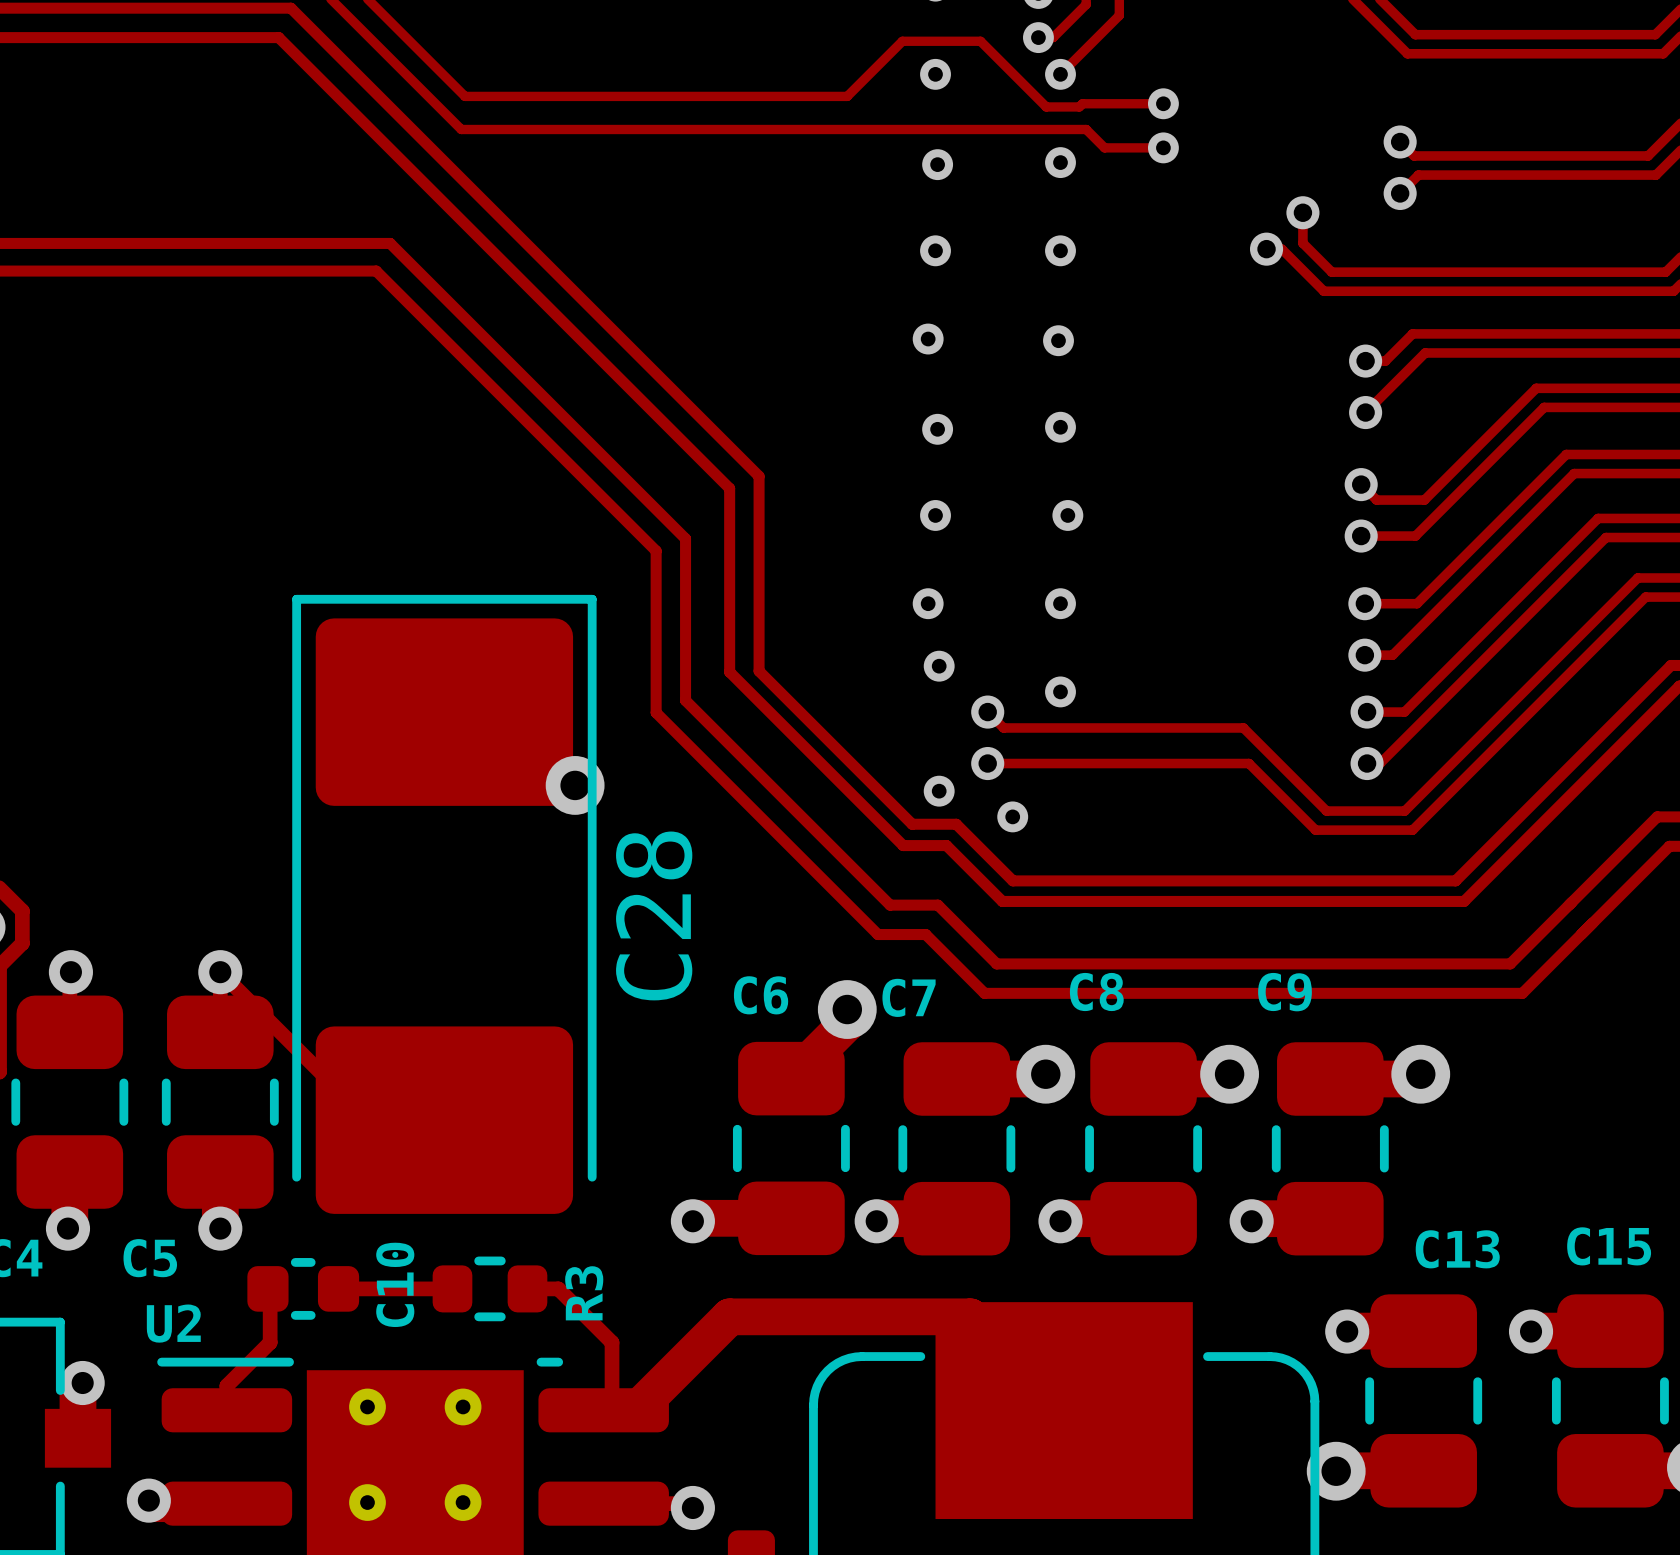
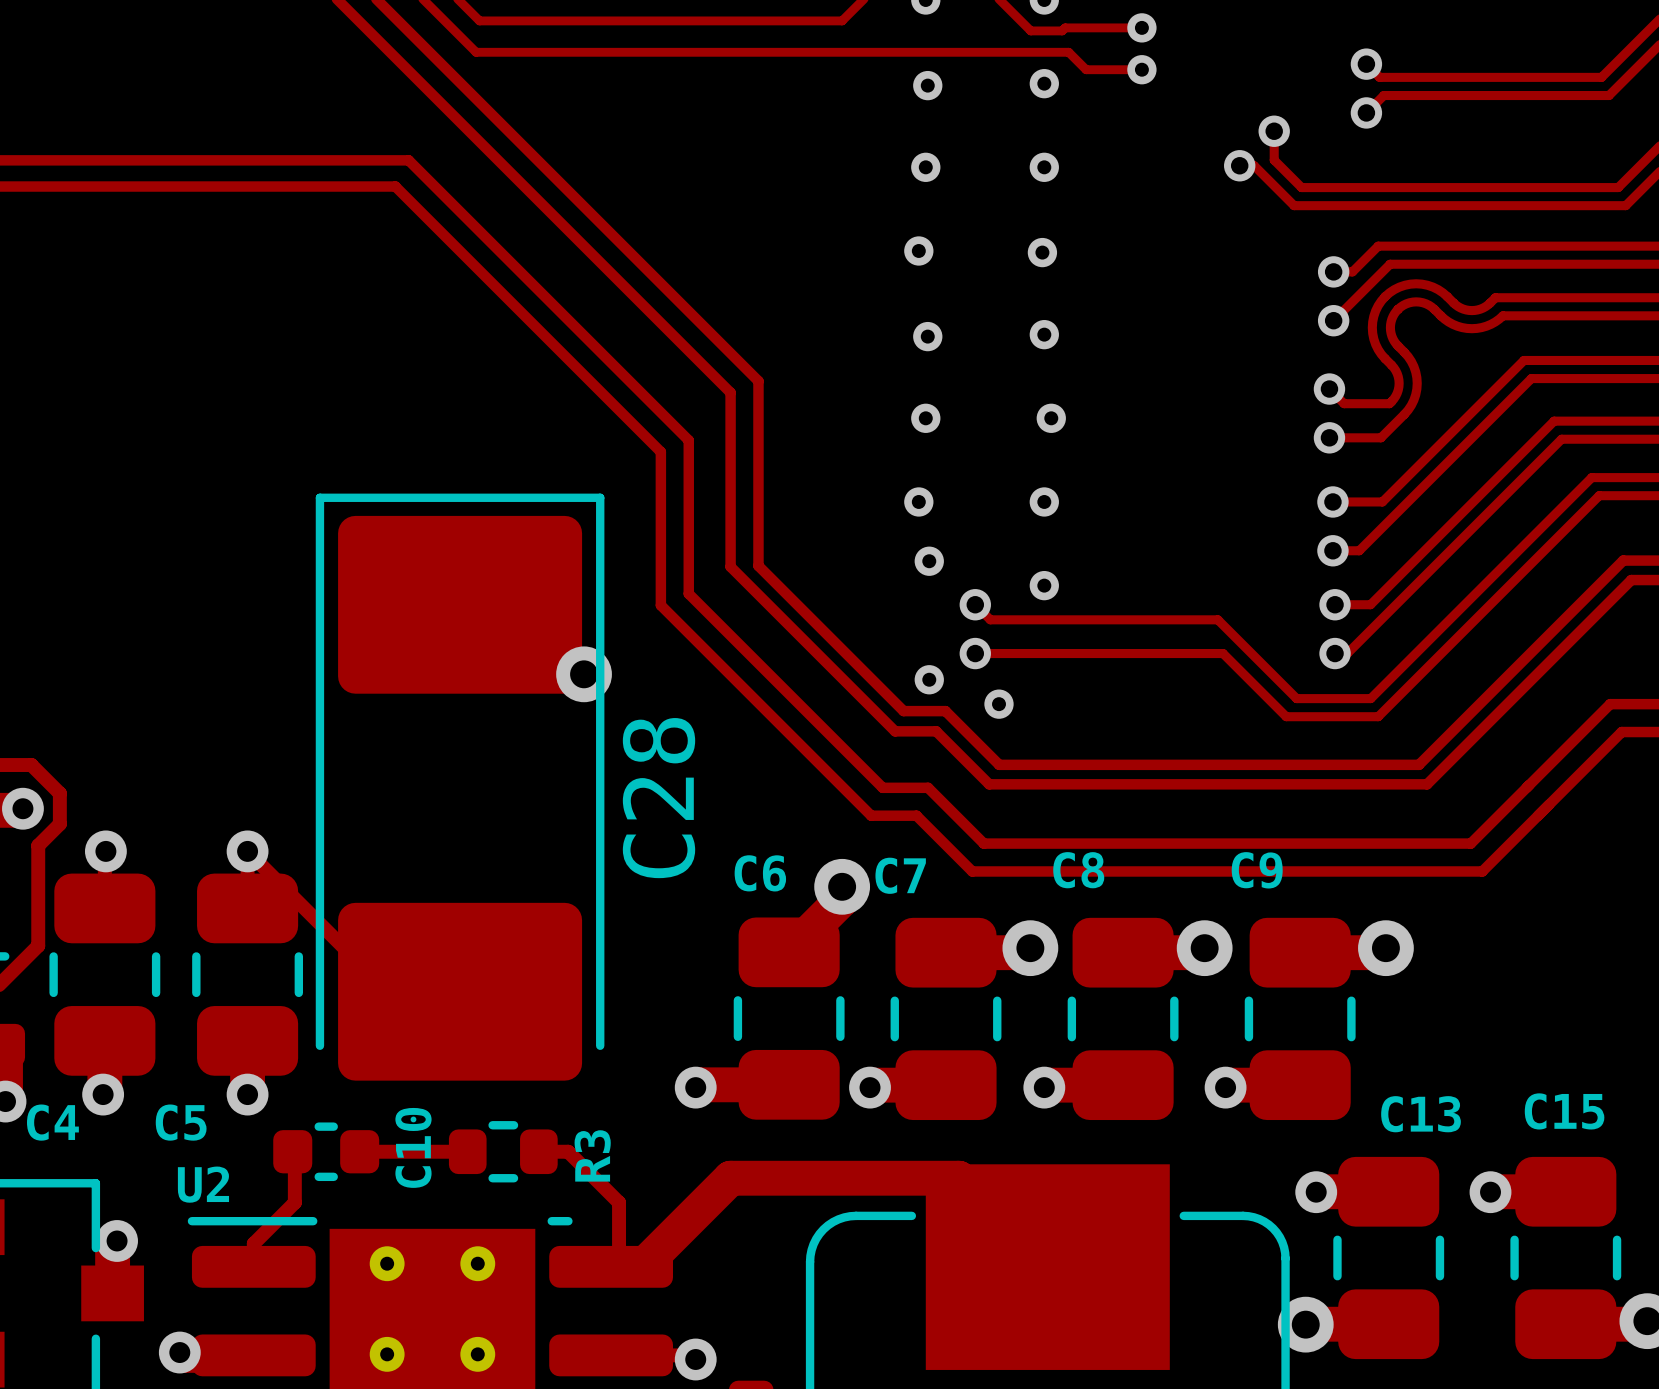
track: (1530, 393) (1426, 497) -> (1490, 303) (1480, 309) (1466, 309) (1455, 304) (1438, 289) (1416, 283) (1399, 287) (1385, 296) (1375, 310) (1372, 327) (1378, 349) (1393, 367) (1398, 376) (1398, 390) (1391, 401)
track: (1544, 407) (1440, 511) -> (1502, 315) (1486, 326) (1467, 328) (1448, 321) (1431, 307) (1422, 302) (1409, 302) (1397, 309) (1391, 321) (1391, 333) (1396, 343) (1411, 361) (1417, 383) (1413, 400) (1404, 414)

